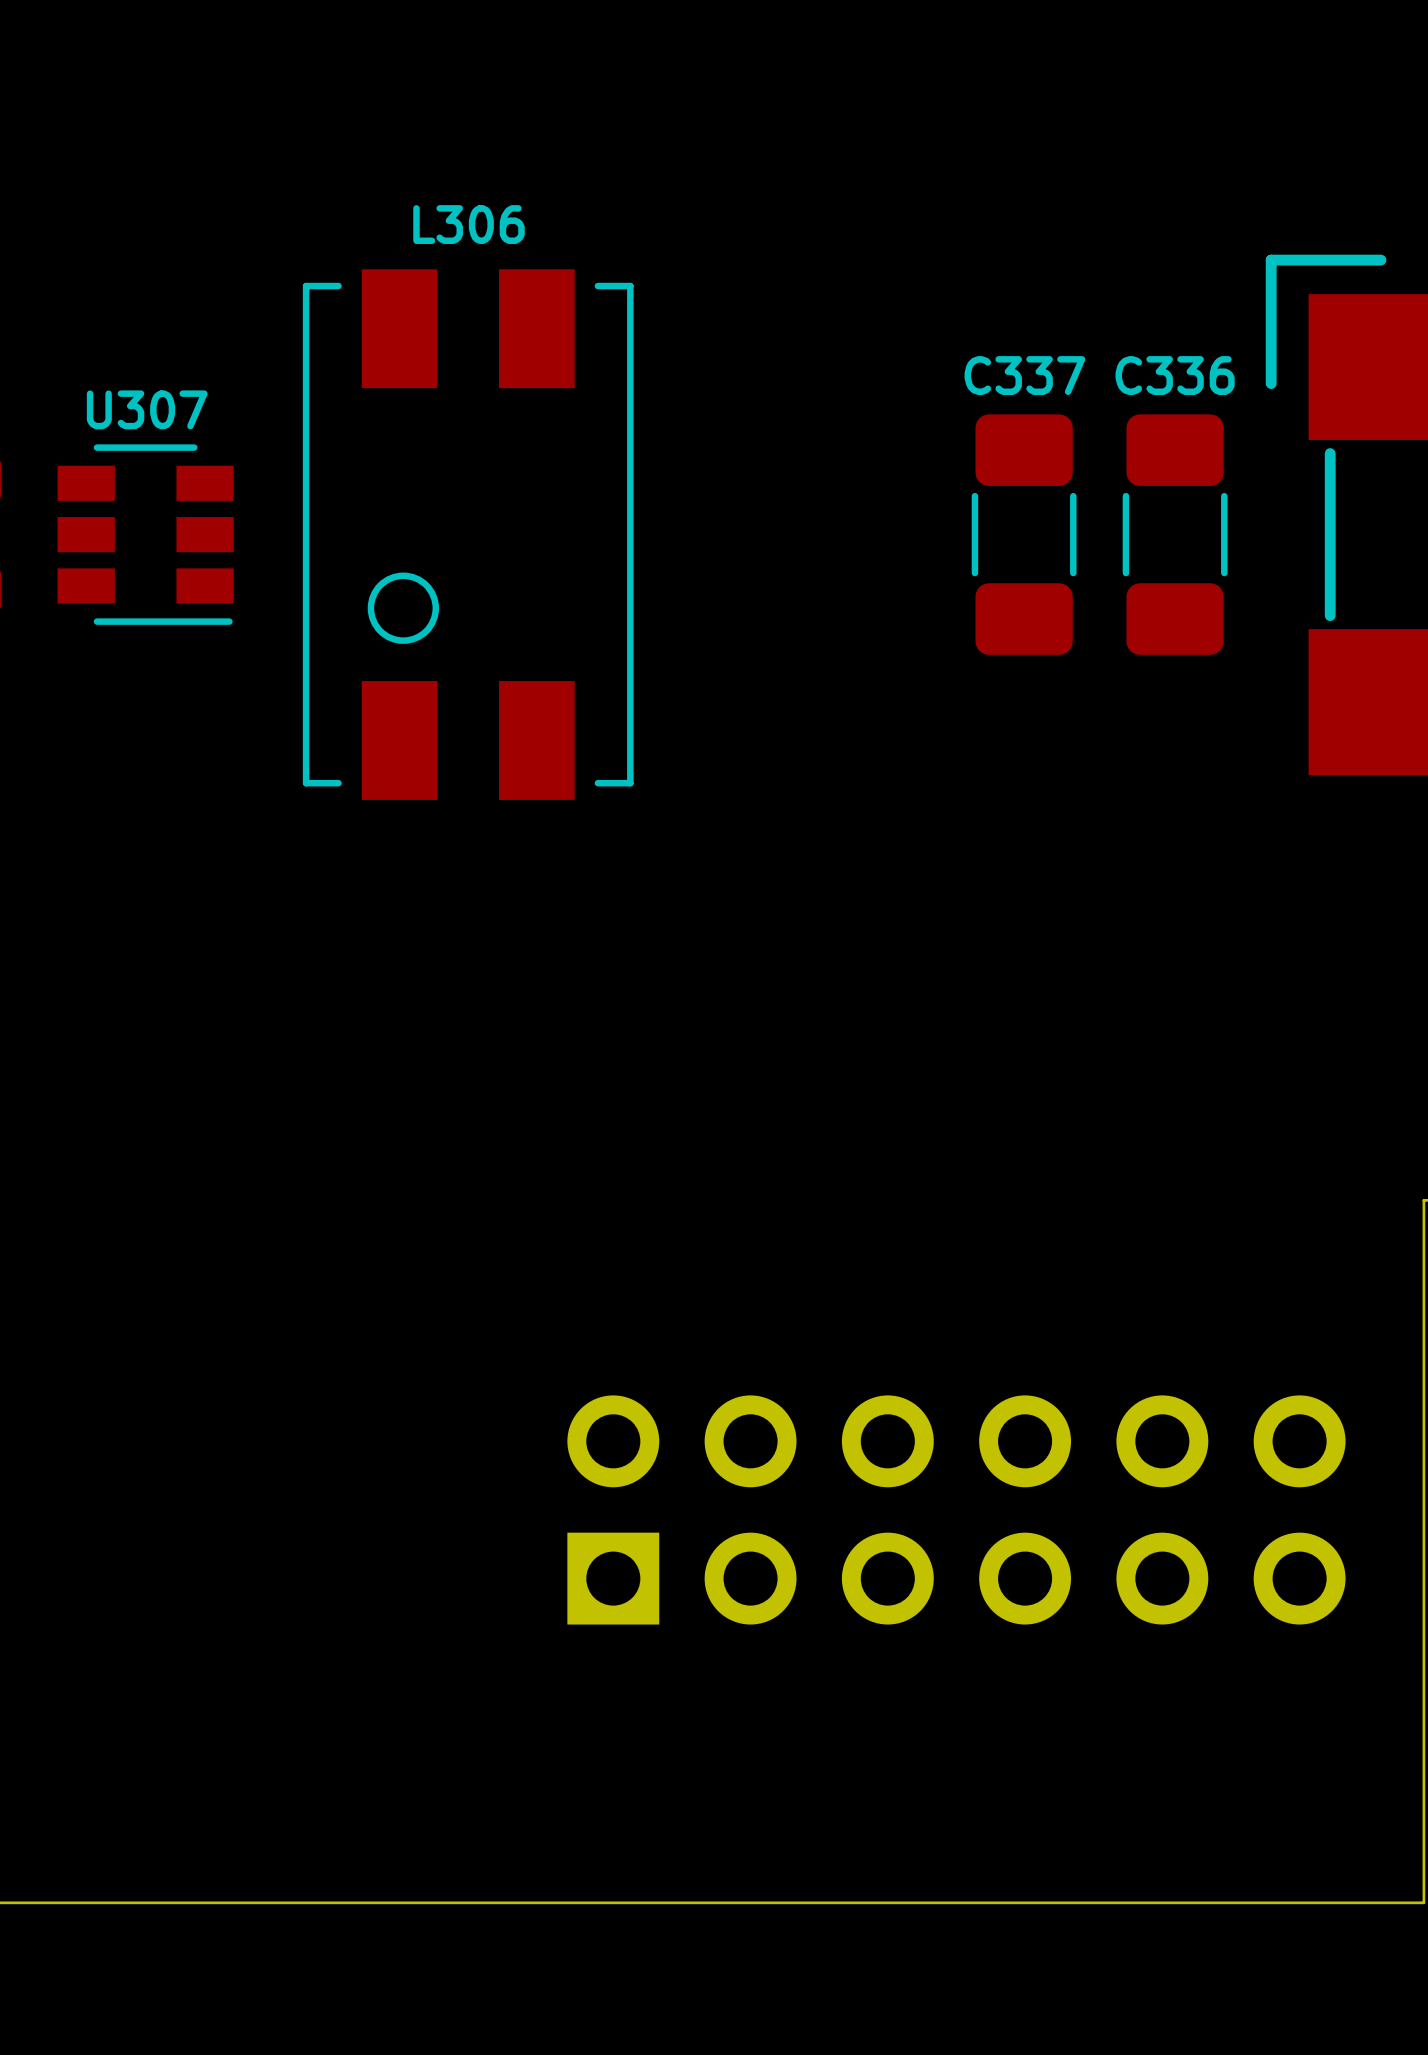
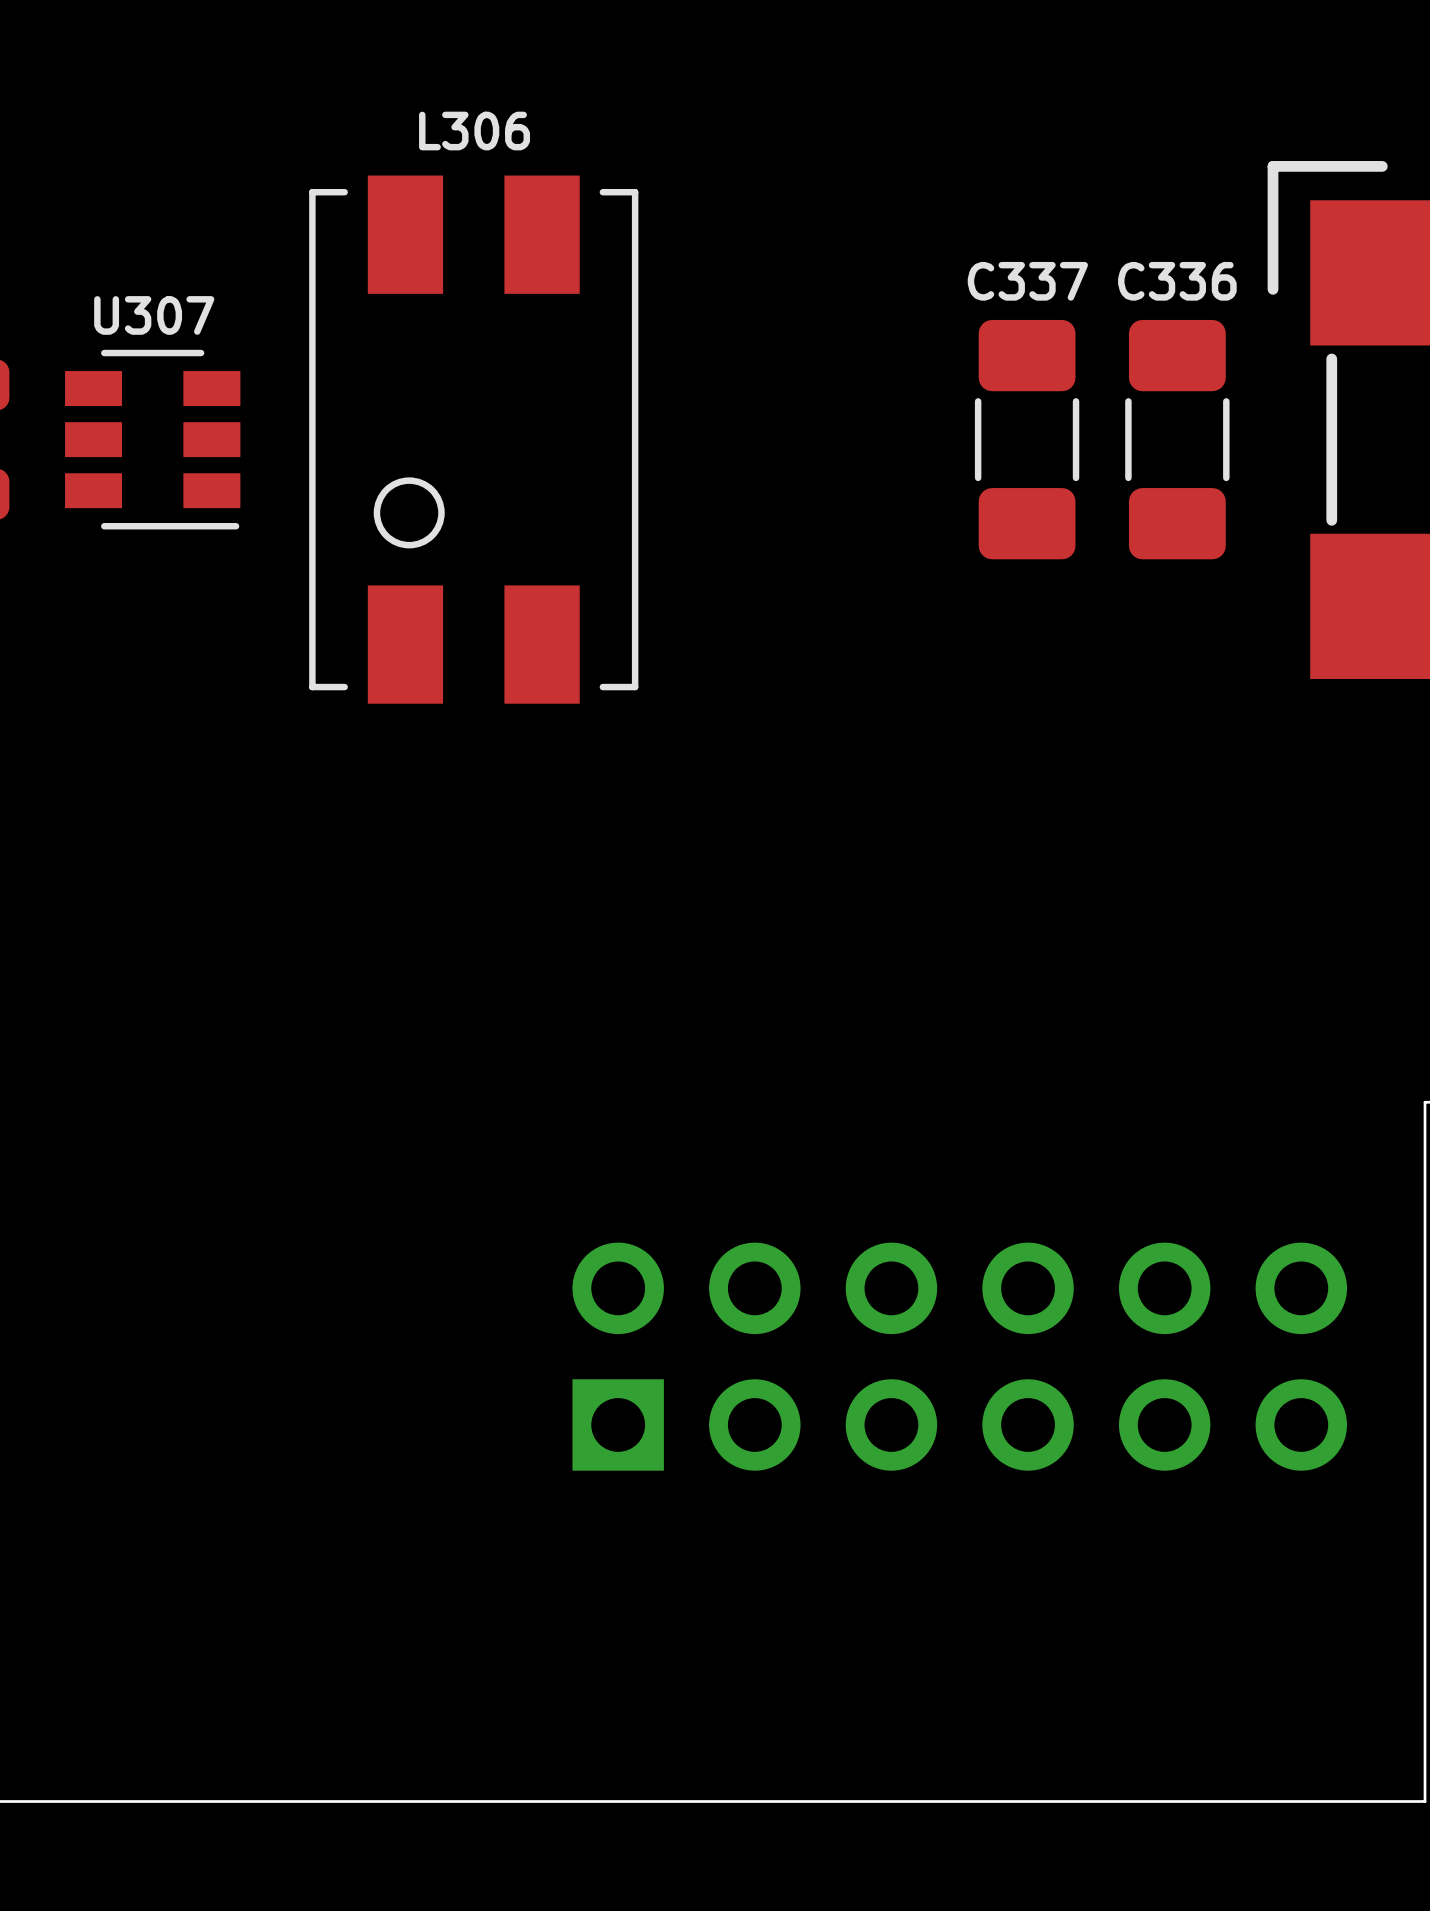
part position: (956, 1509) -> (959, 1356)

